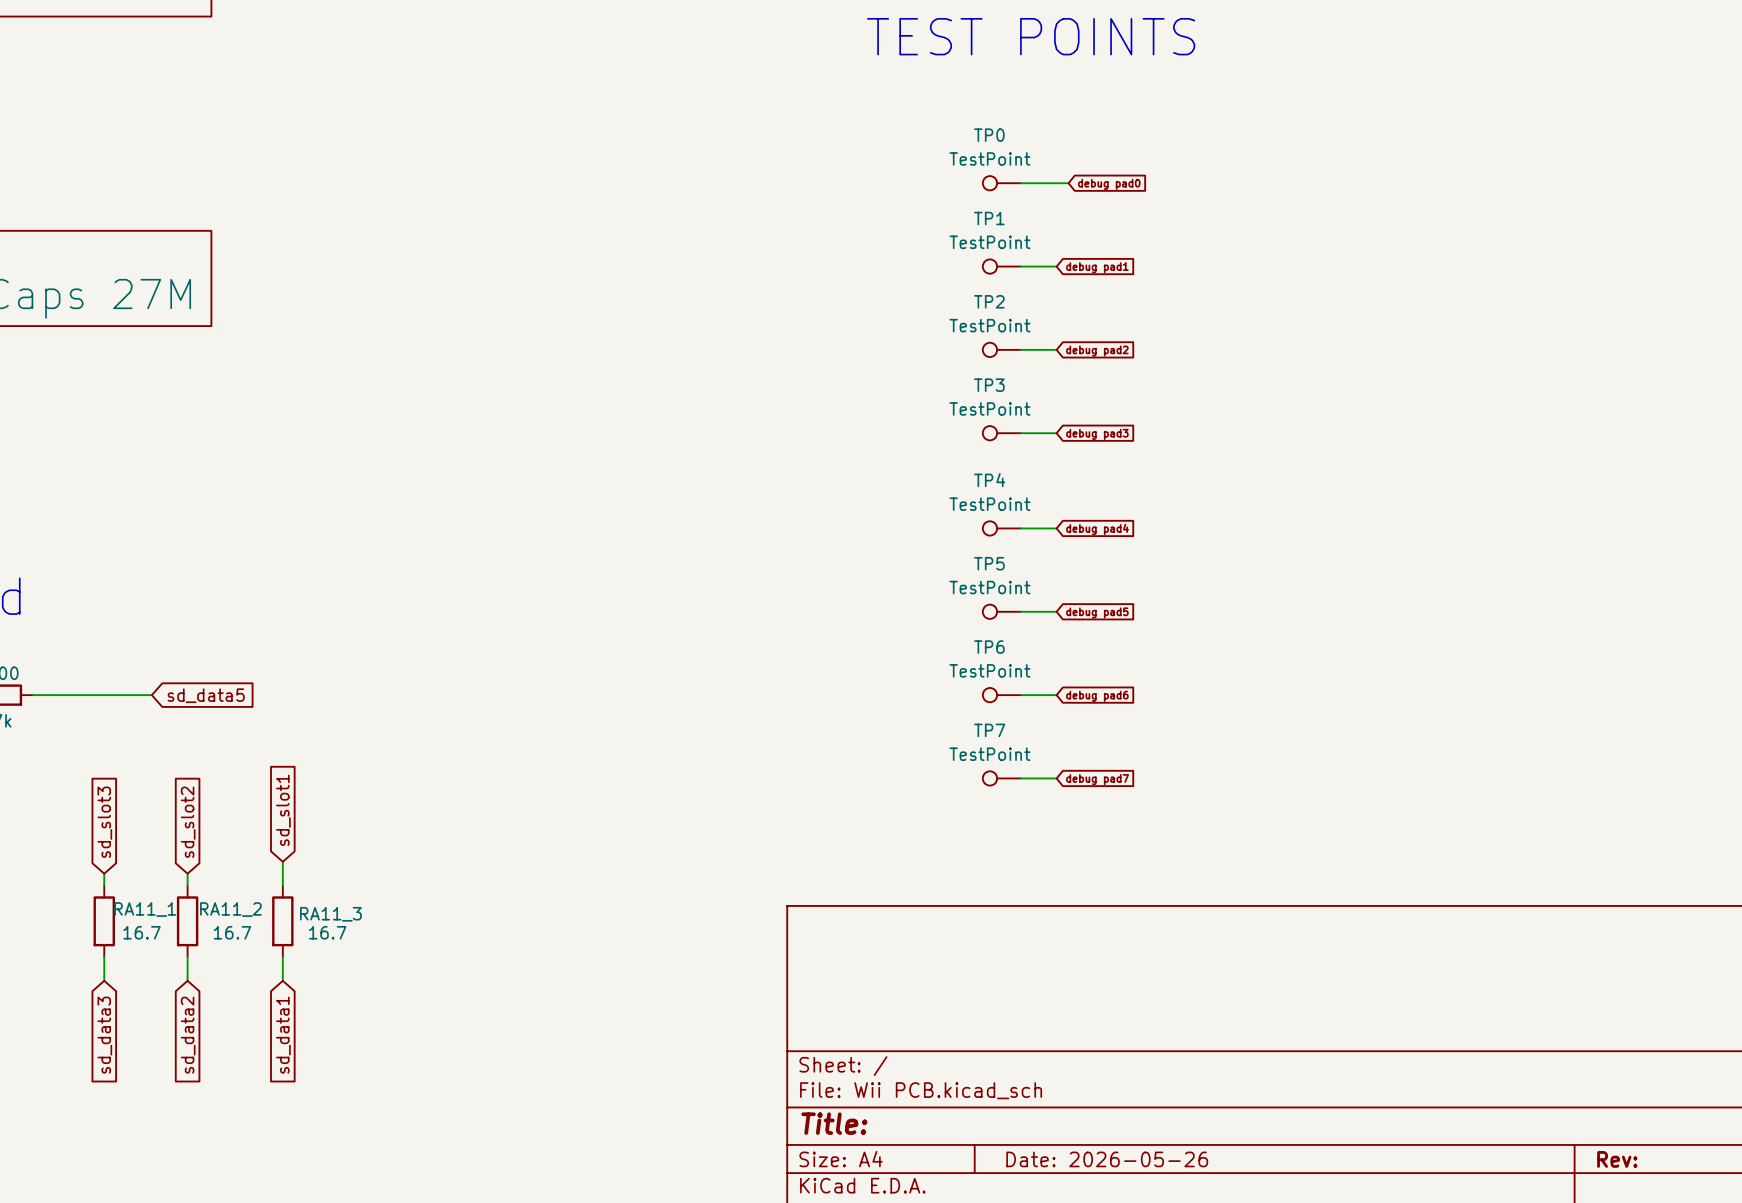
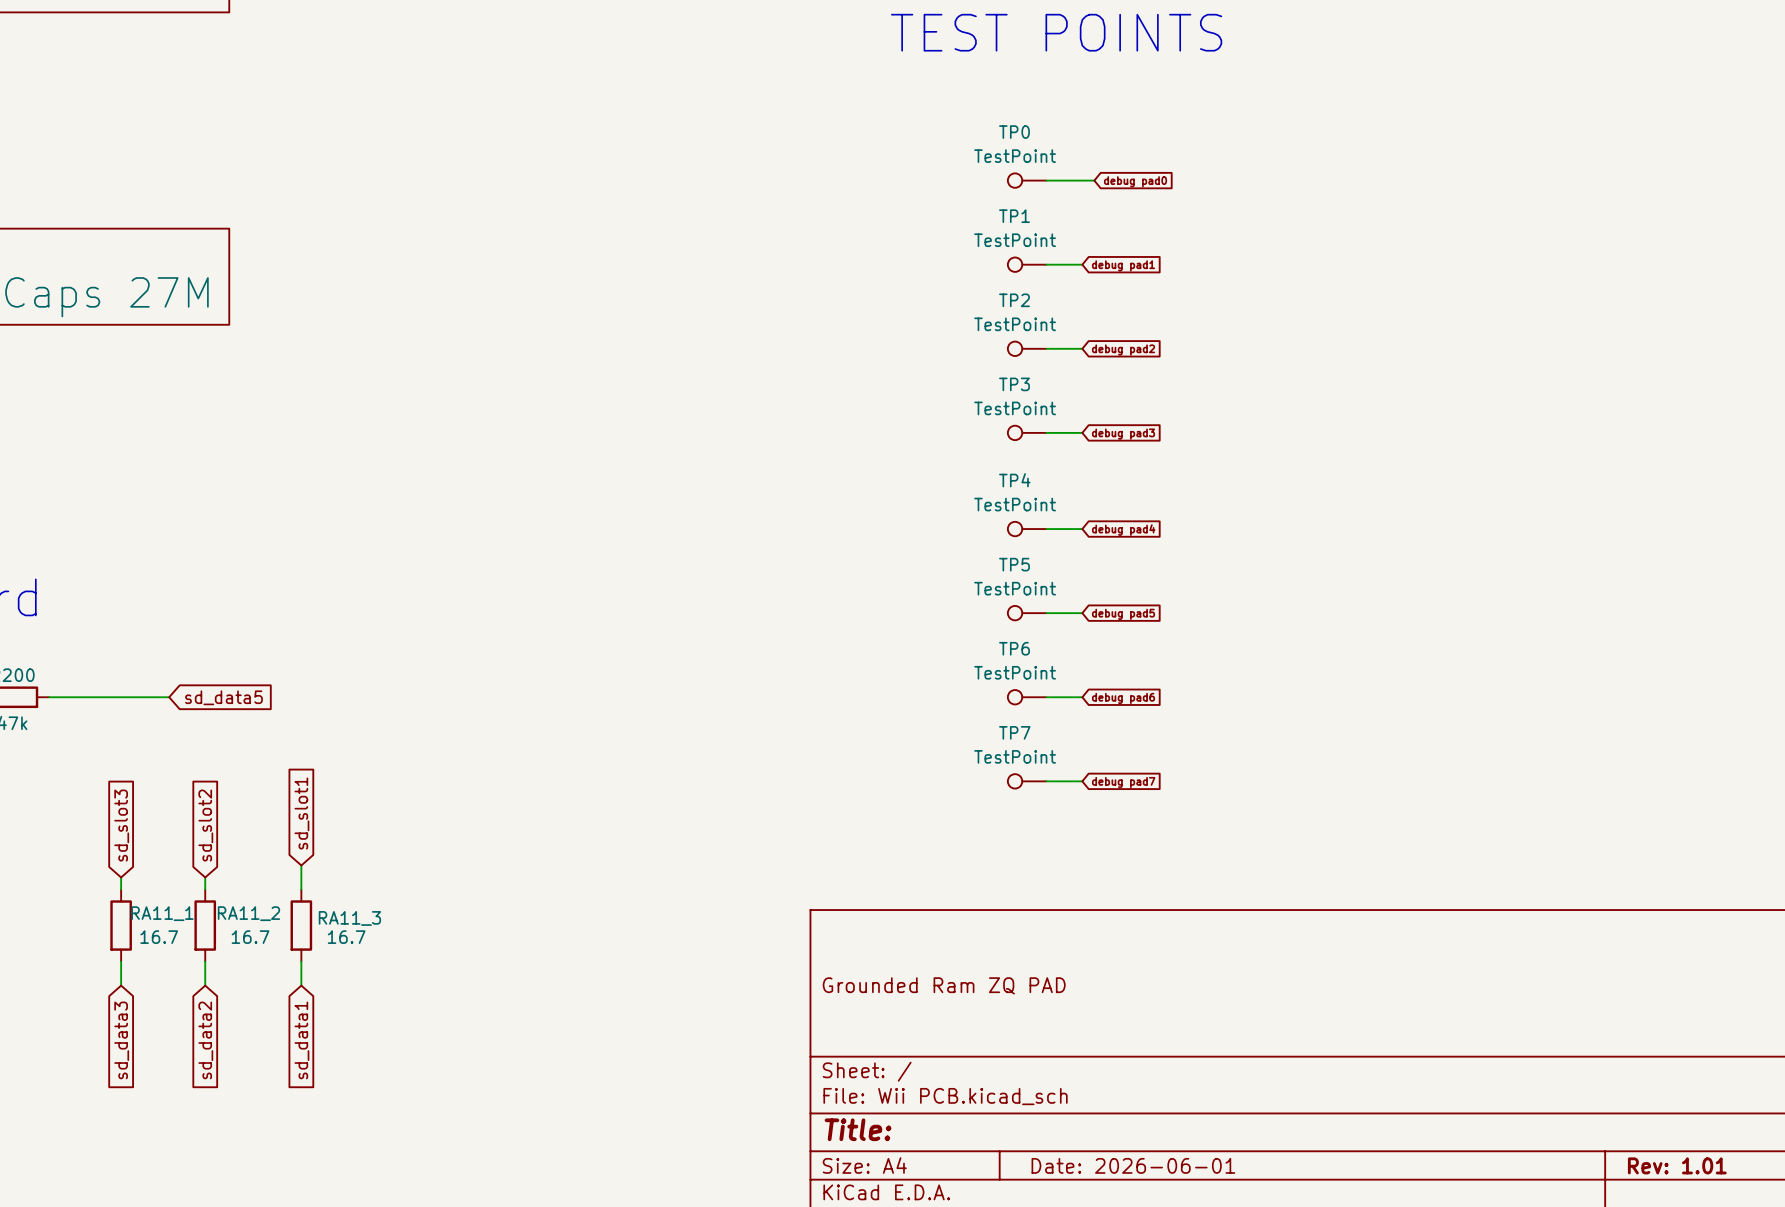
title block: none -> Grounded Ram ZQ PAD (944, 985)
title block: Date: 2026-05-26 (1107, 1159) -> Date: 2026-06-01 (1133, 1165)
title block: Rev: (1617, 1159) -> Rev: 1.01 (1677, 1165)

